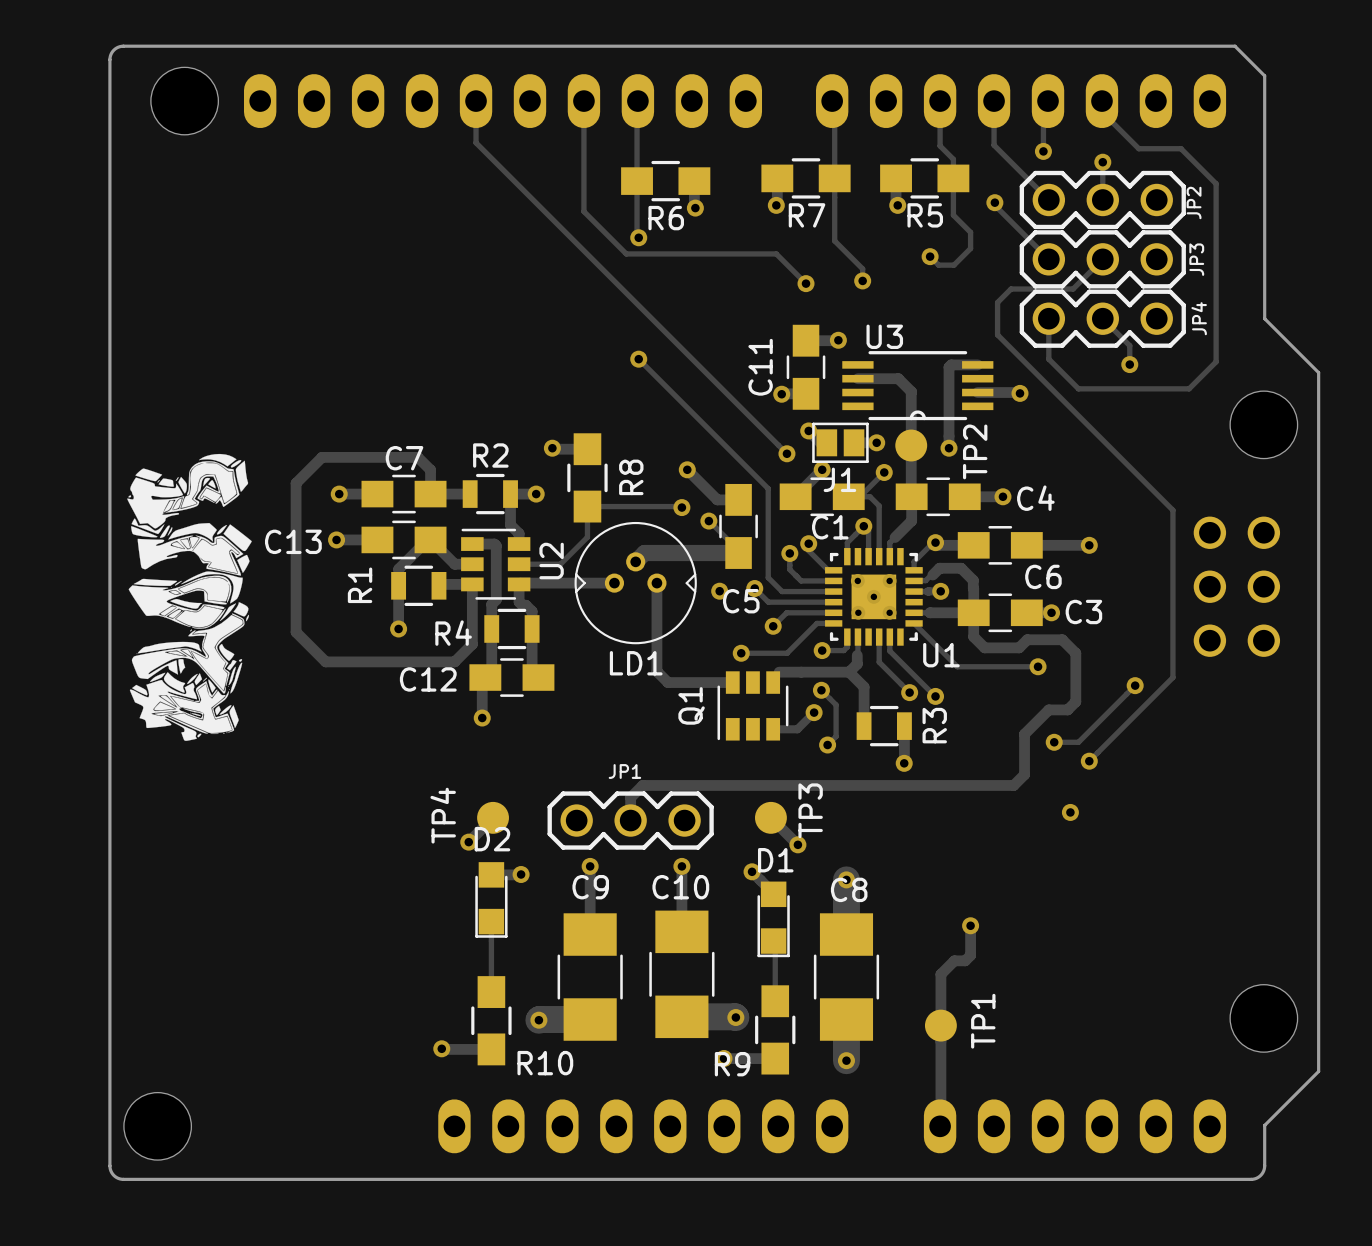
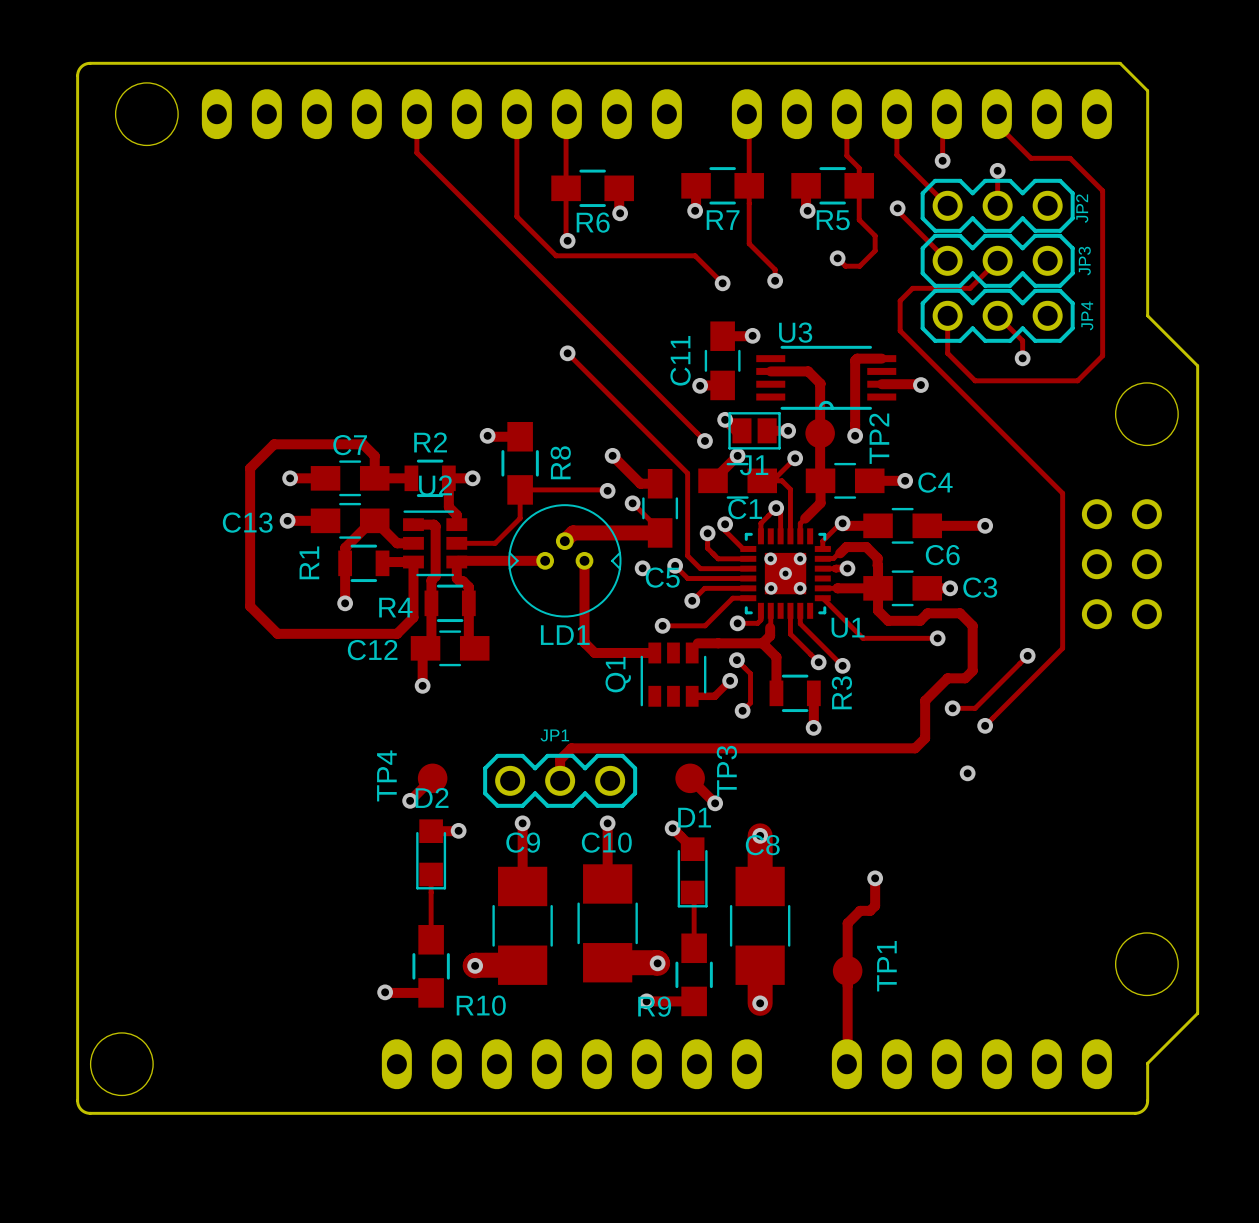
drawing: [127, 453, 252, 741] -> none
U2 name rotation: 0° (551, 561) -> 90° clockwise (435, 485)
U2 name position: U2 (551, 561) -> U2 (435, 485)

